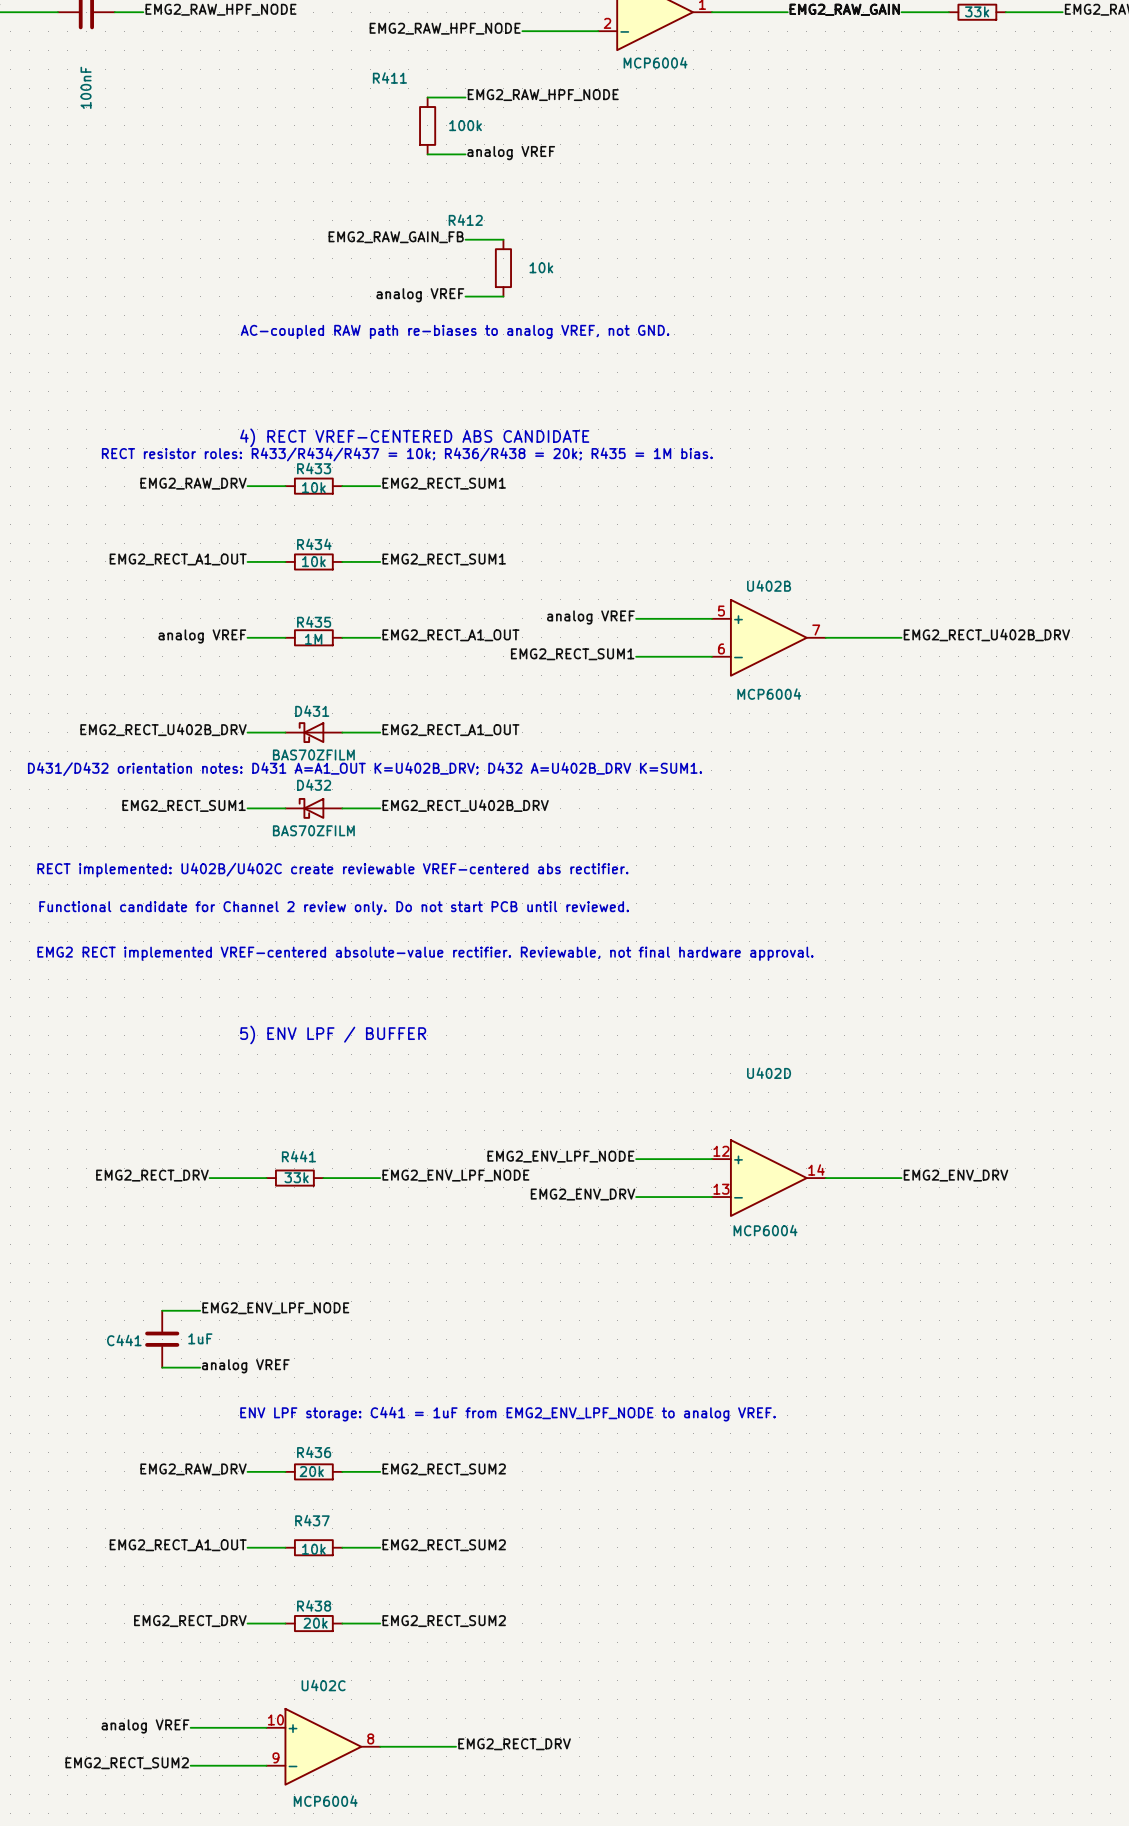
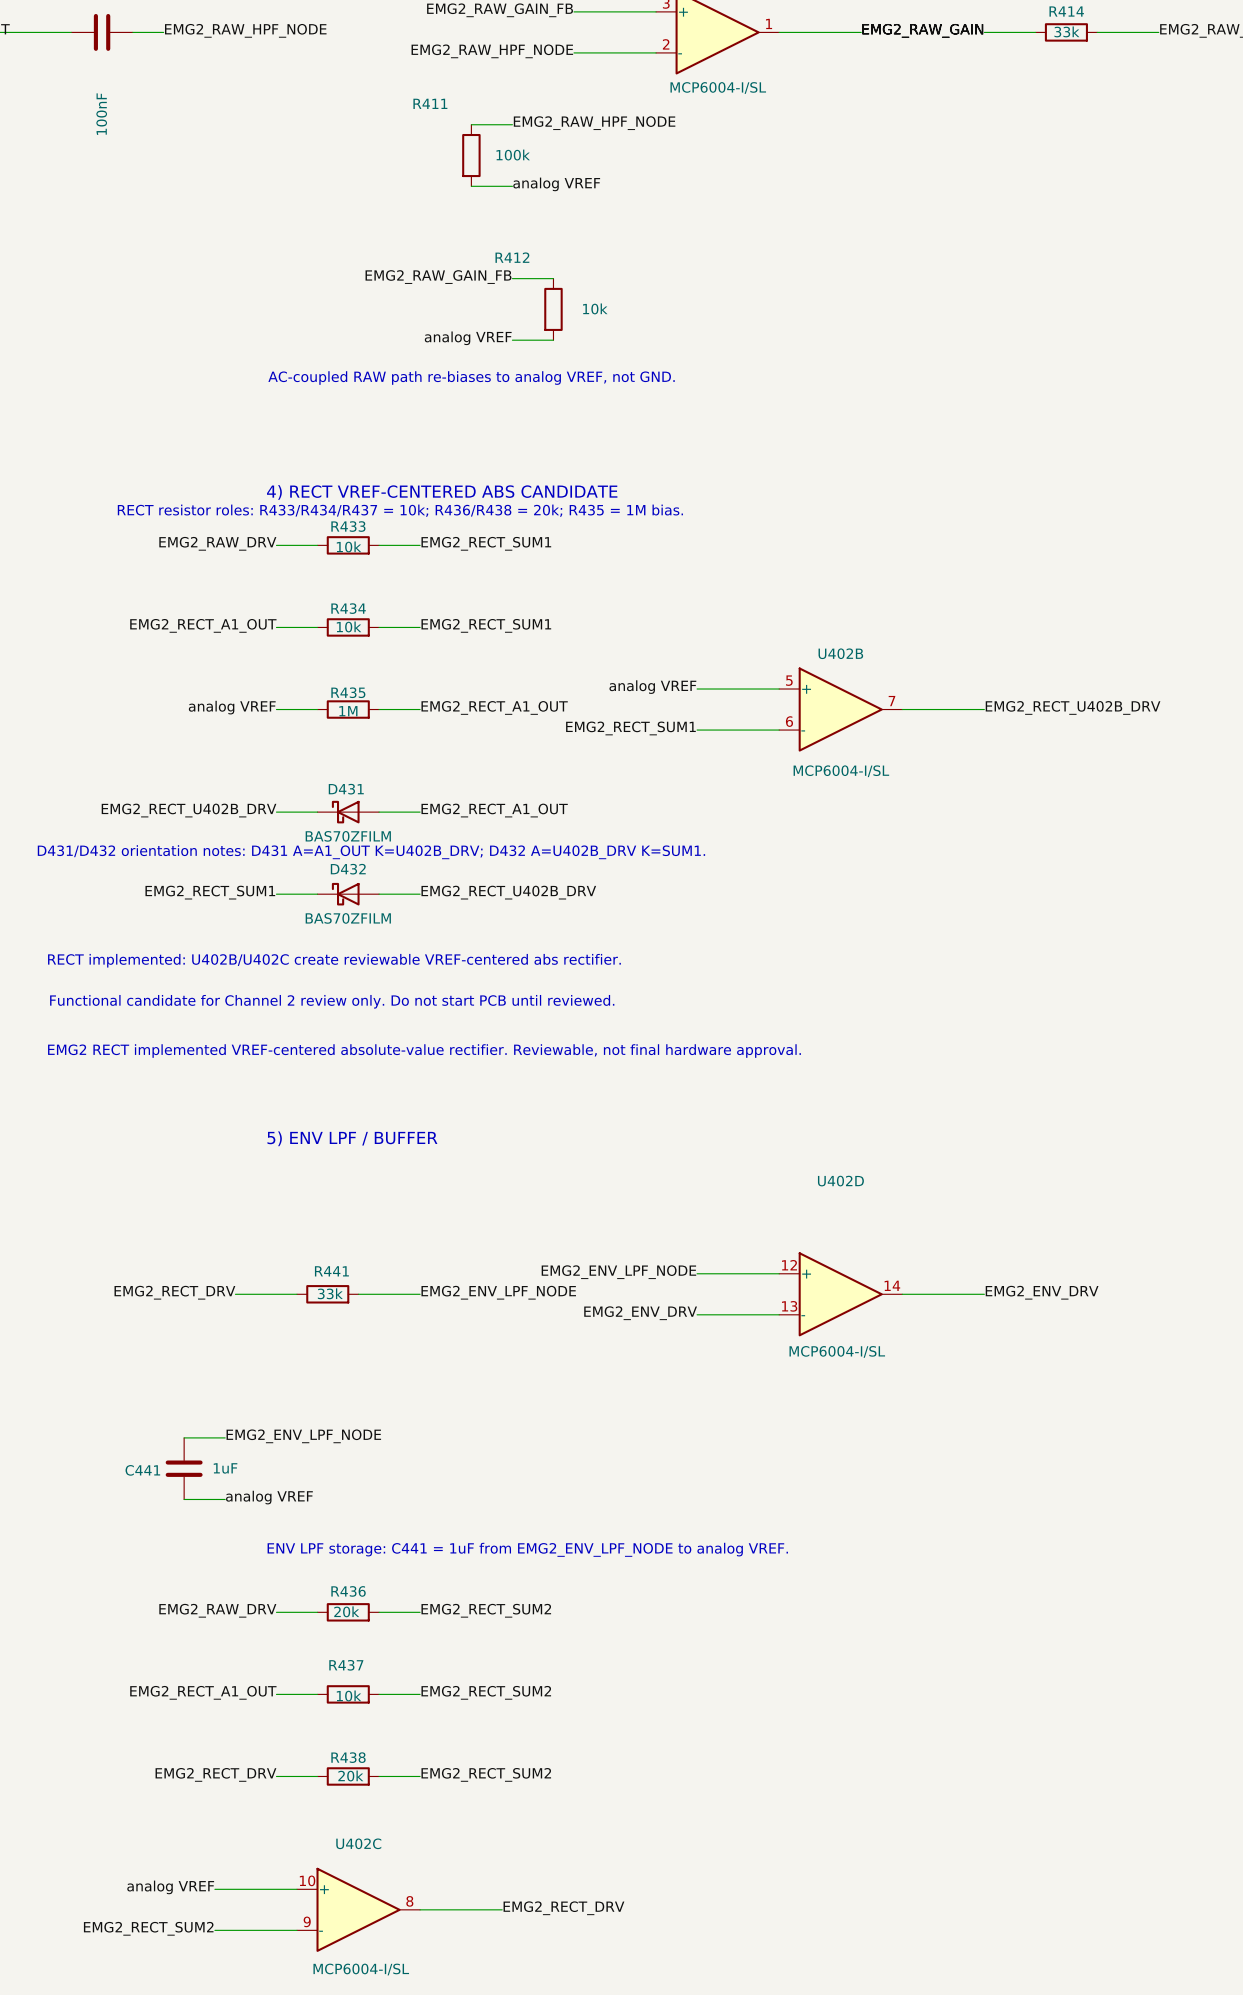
part value: MCP6004 (655, 62) -> MCP6004-I/SL (718, 87)
U402B value: MCP6004 (769, 694) -> MCP6004-I/SL (841, 771)
U402D value: MCP6004 (765, 1230) -> MCP6004-I/SL (837, 1351)
U402C value: MCP6004 (325, 1801) -> MCP6004-I/SL (361, 1969)

